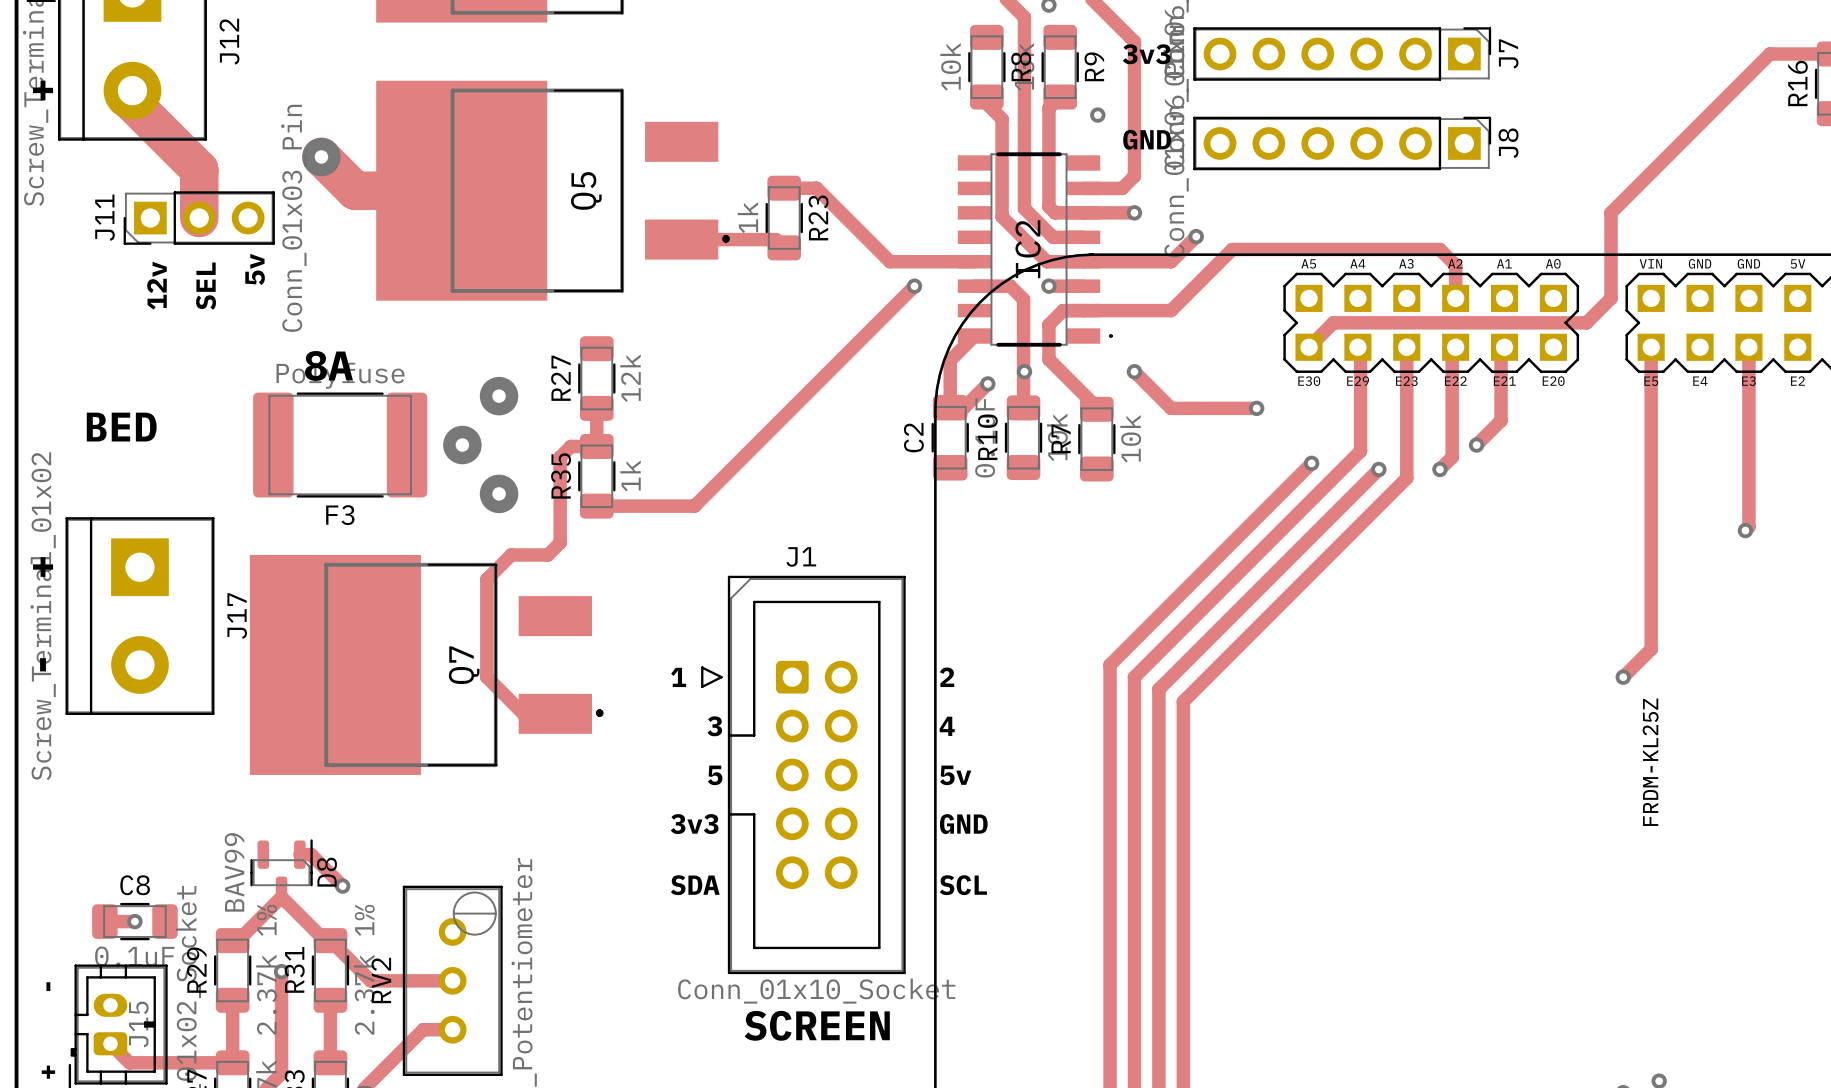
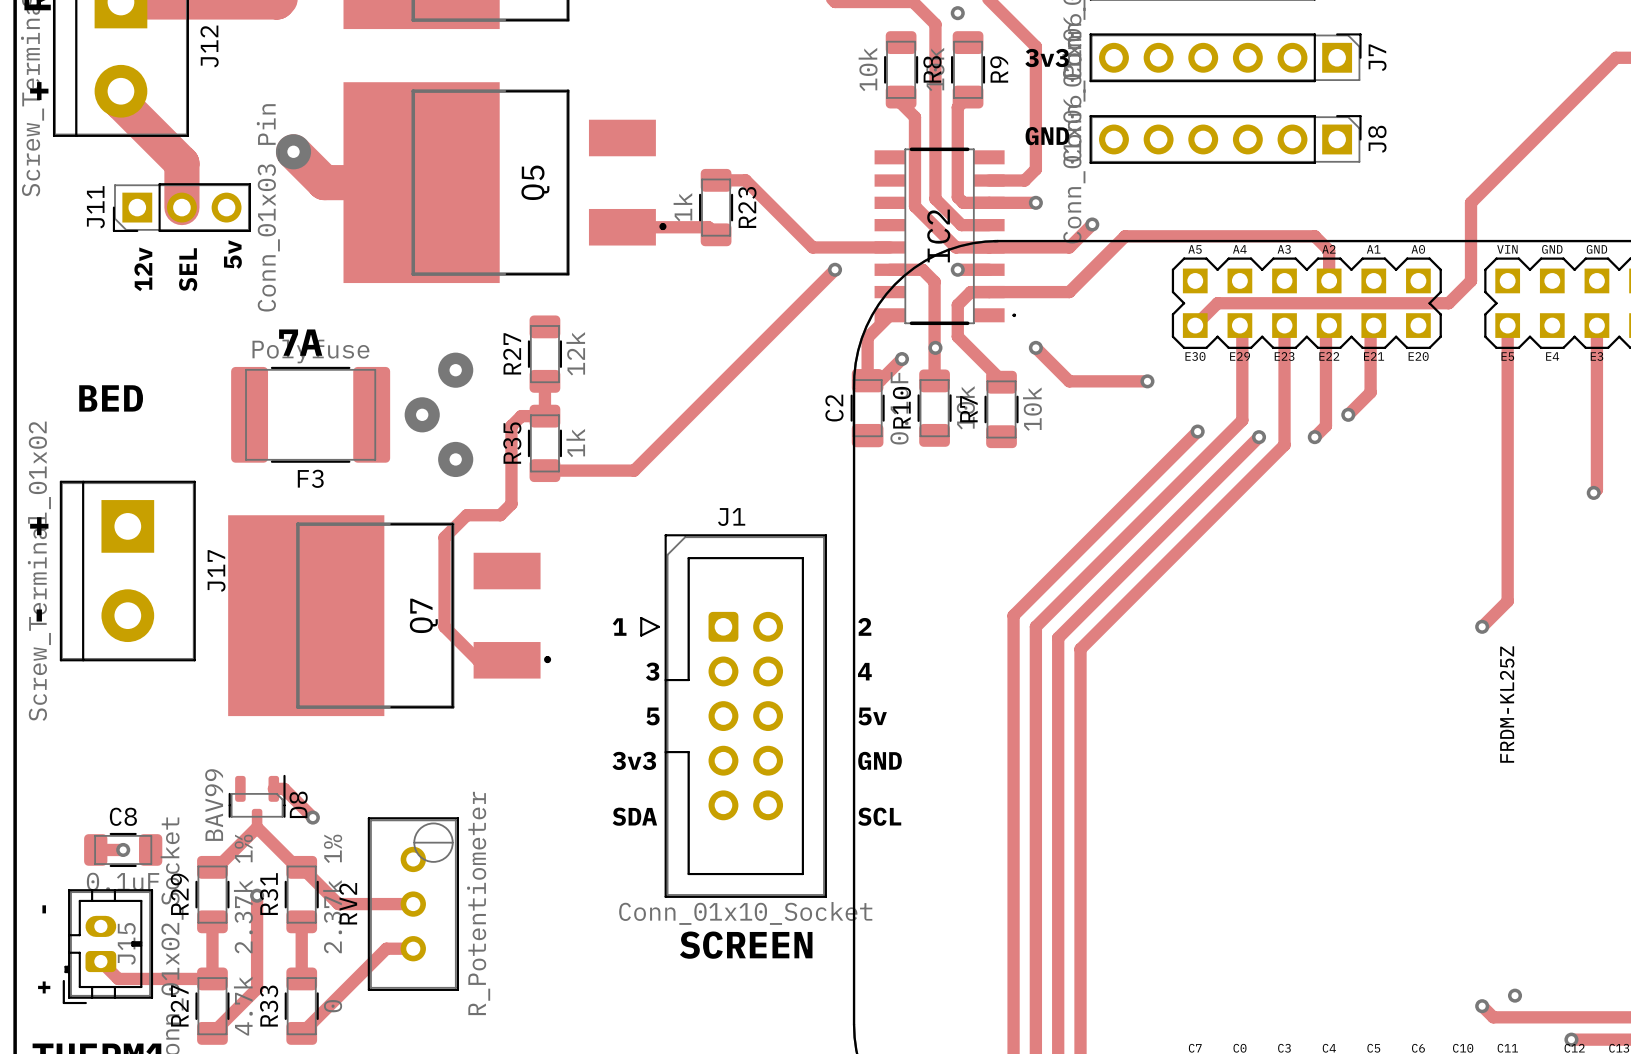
via: (1097, 115) -> none
text: 8A (329, 365) -> 7A (300, 342)

